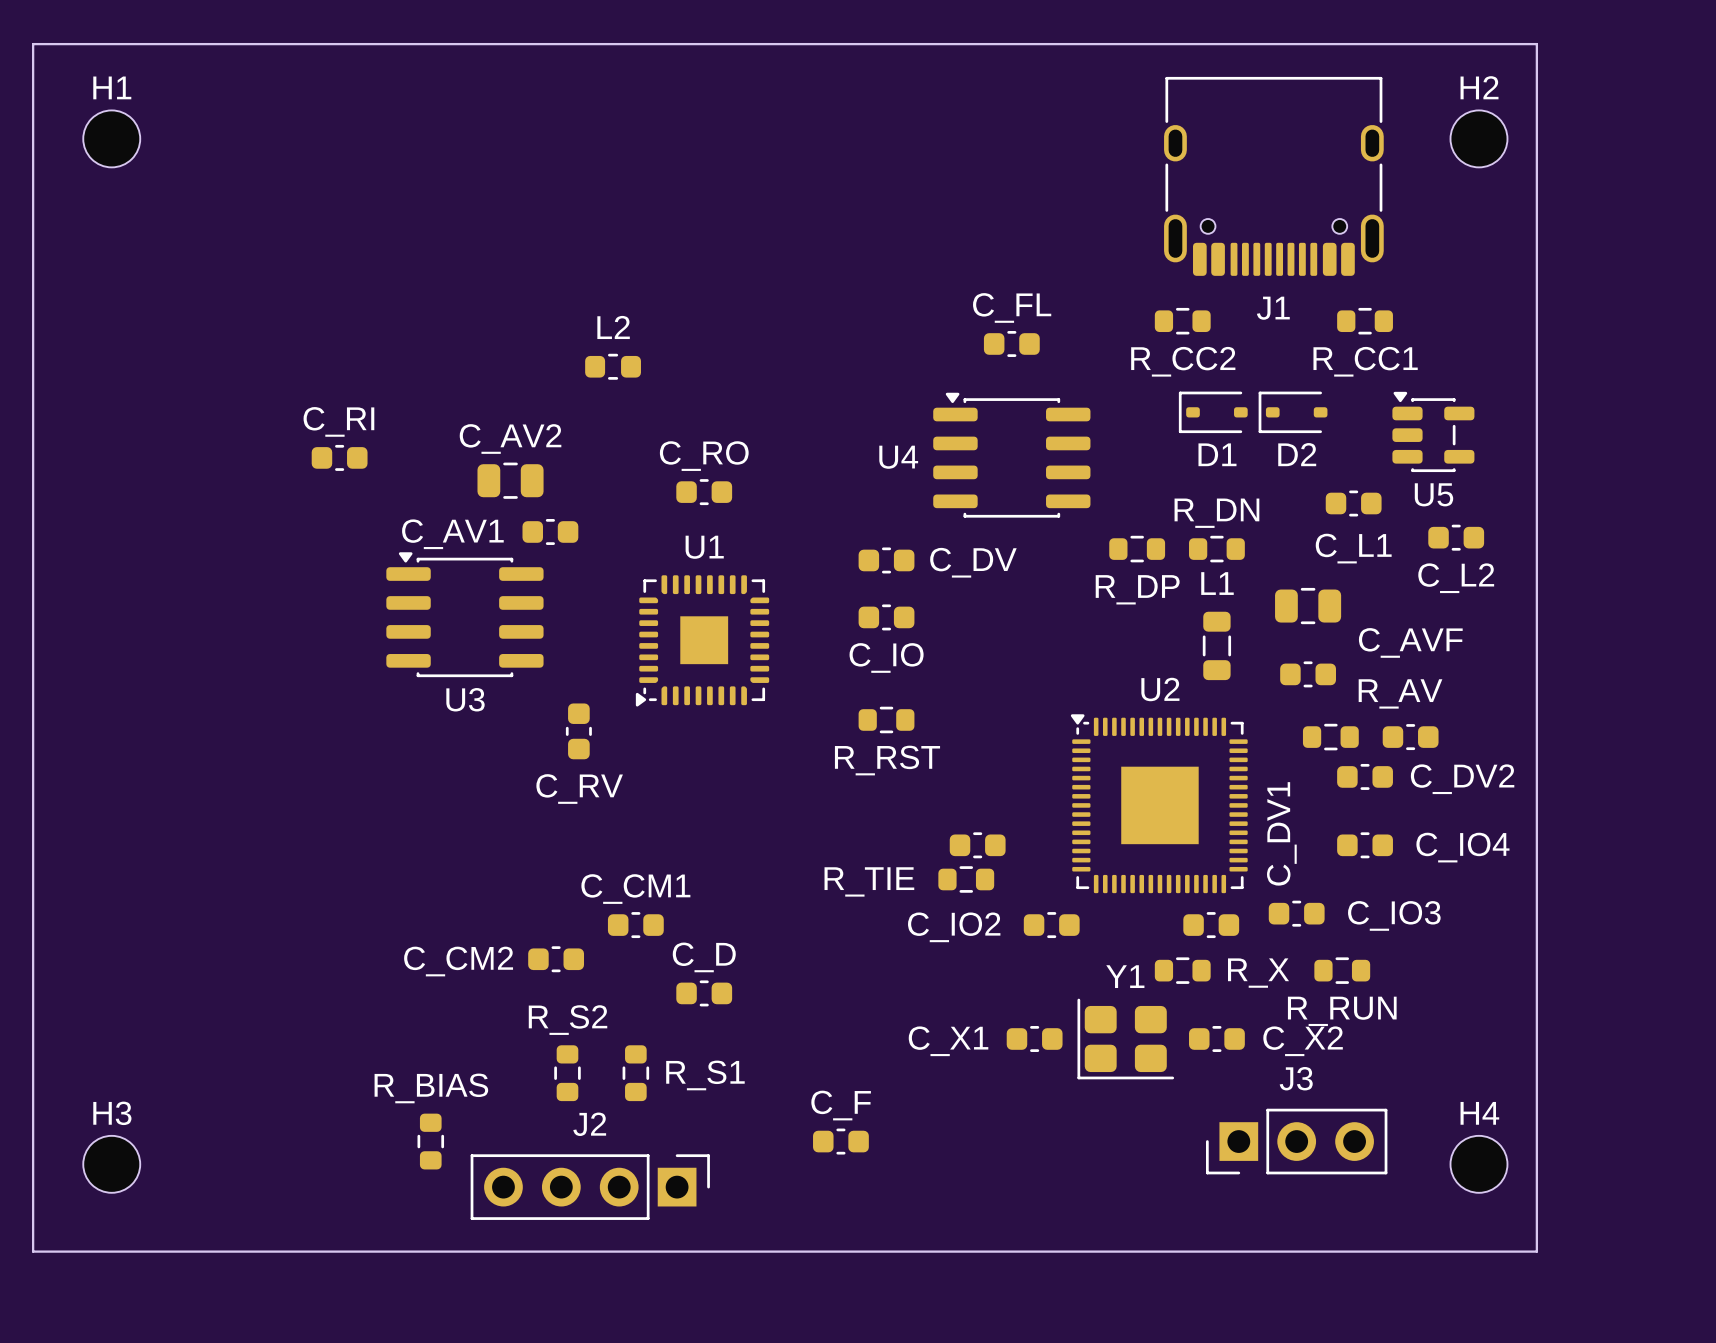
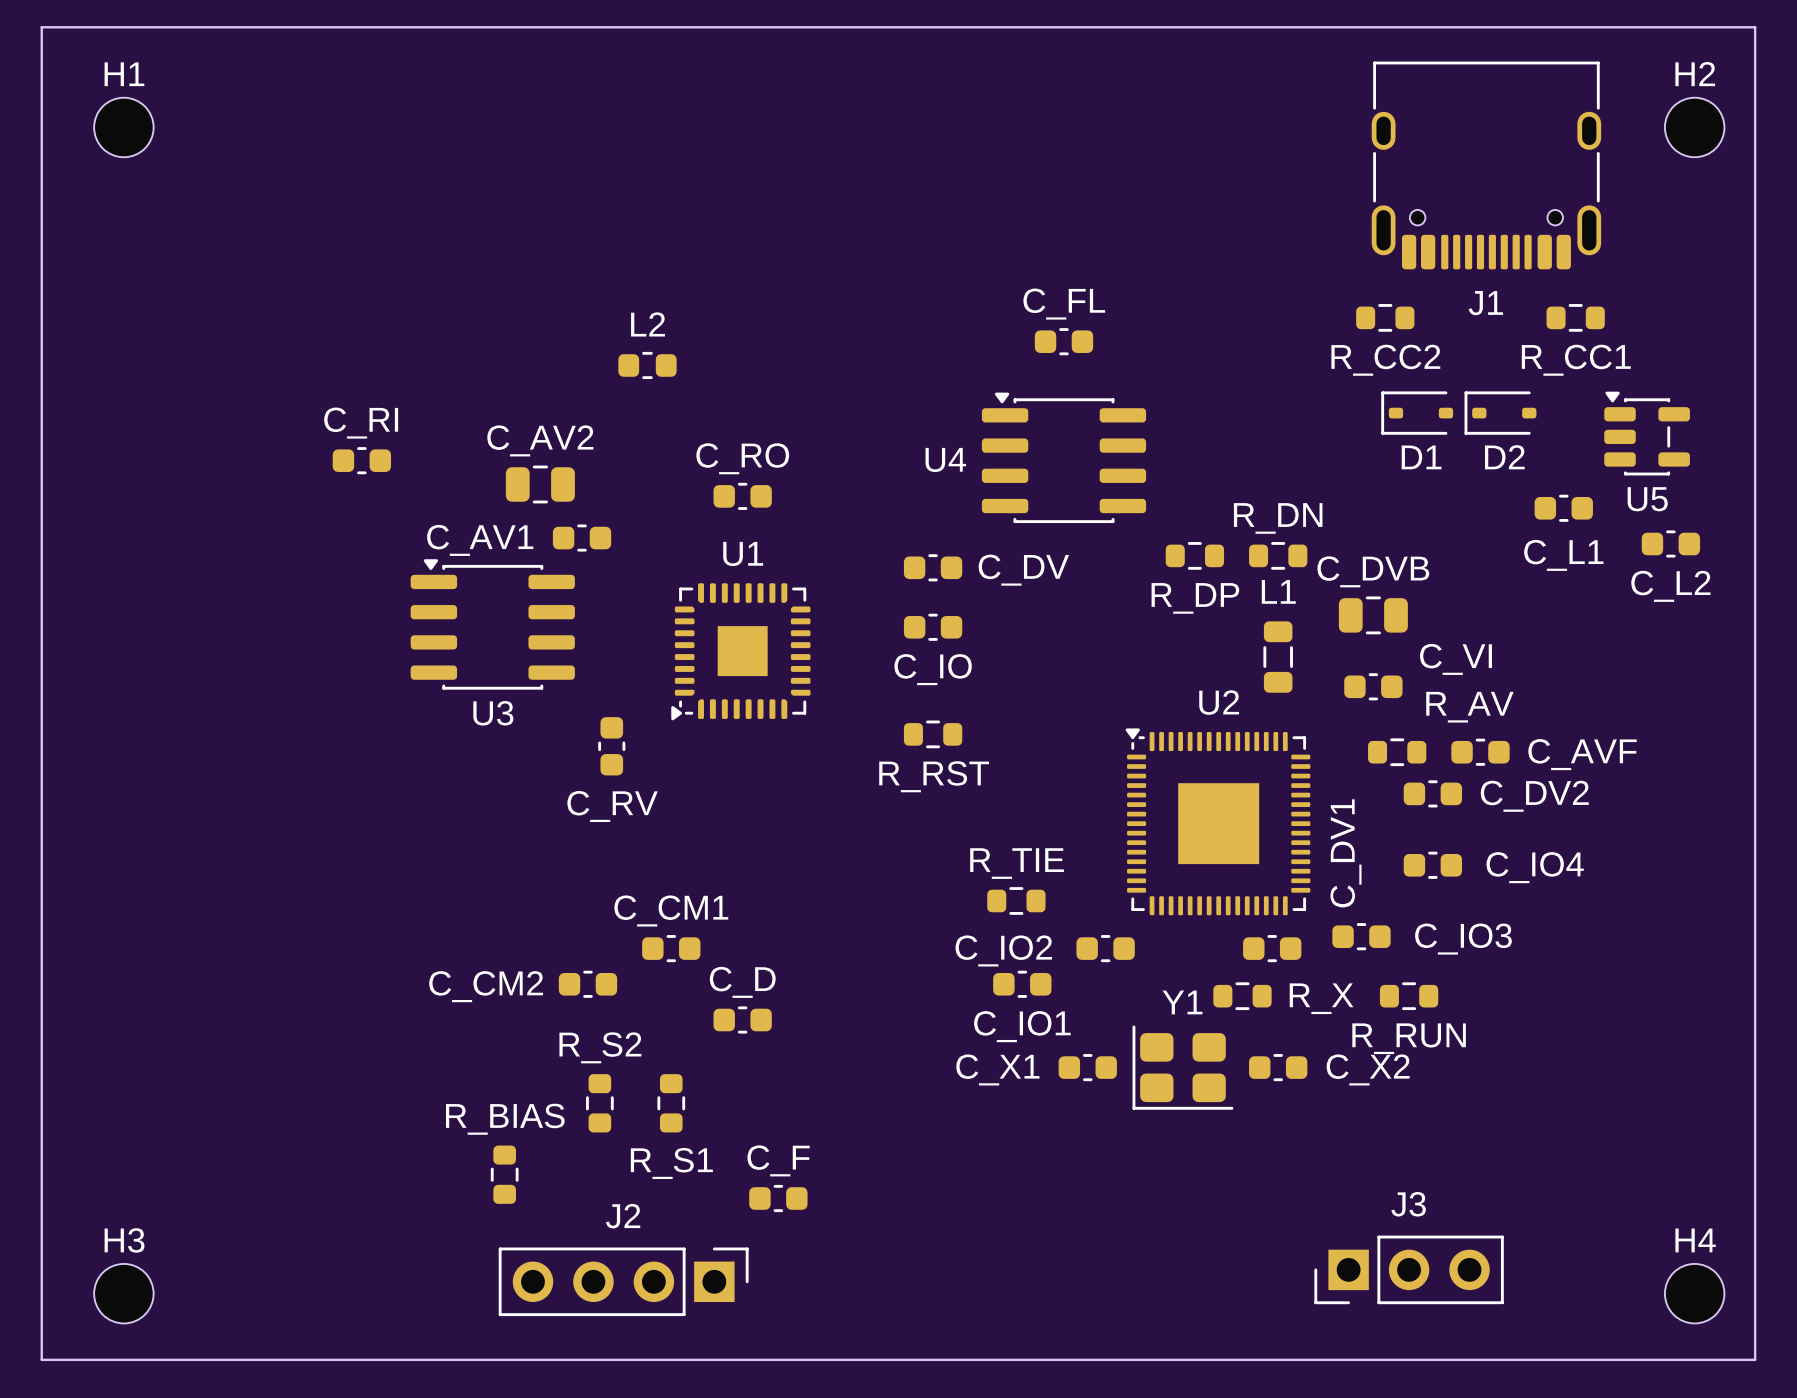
board edge: (33, 44) (1536, 44) (1536, 1251) (33, 1251) -> (41, 28) (1755, 27) (1755, 1359) (41, 1359) (41, 1289)
H2 position: (1478, 138) -> (1694, 127)
J1 position: (1273, 176) -> (1486, 165)
R_CC2 position: (1182, 321) -> (1385, 317)
R_CC1 position: (1365, 321) -> (1575, 317)
D1 position: (1213, 412) -> (1417, 413)
D2 position: (1293, 412) -> (1500, 413)
U5 position: (1433, 431) -> (1647, 433)
C_L1 position: (1353, 503) -> (1563, 508)
C_L2 position: (1456, 537) -> (1670, 543)
C_DVB name: none -> C_DVB (1373, 571)
C_AVF name position: C_AVF (1410, 642) -> C_AVF (1582, 754)
C_VI name: none -> C_VI (1455, 659)
part: (977, 845) -> none
R_TIE name position: R_TIE (869, 881) -> R_TIE (1017, 863)
C_IO1: none -> (1022, 984)
R_S1 name position: R_S1 (705, 1075) -> R_S1 (671, 1163)
R_BIAS position: (430, 1141) -> (504, 1174)
C_F position: (840, 1141) -> (778, 1198)
J3 position: (1296, 1141) -> (1409, 1269)
H3 position: (111, 1164) -> (123, 1293)
H4 position: (1478, 1164) -> (1694, 1293)
J2 position: (590, 1187) -> (623, 1281)

